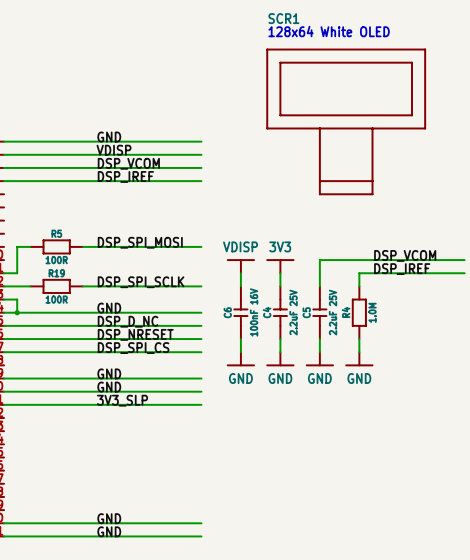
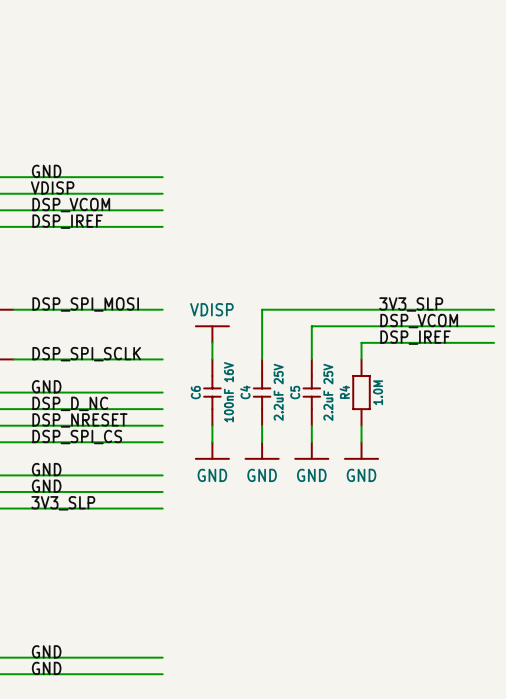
SCR1: 128x64 White OLED (346, 121) -> none
label: none -> 3V3_SLP (411, 304)
wire: none -> (494, 309) (262, 309) (262, 342)
power symbol: 3V3 (280, 266) -> none

